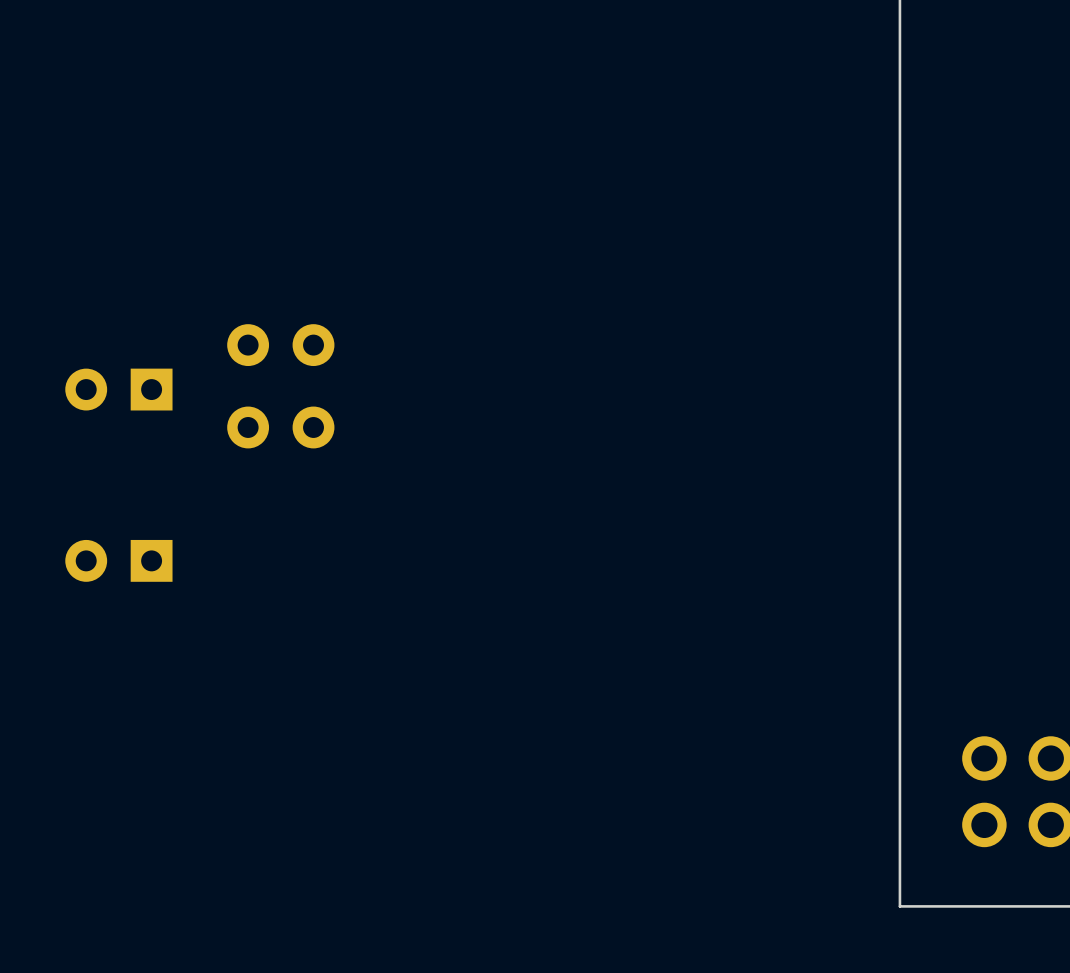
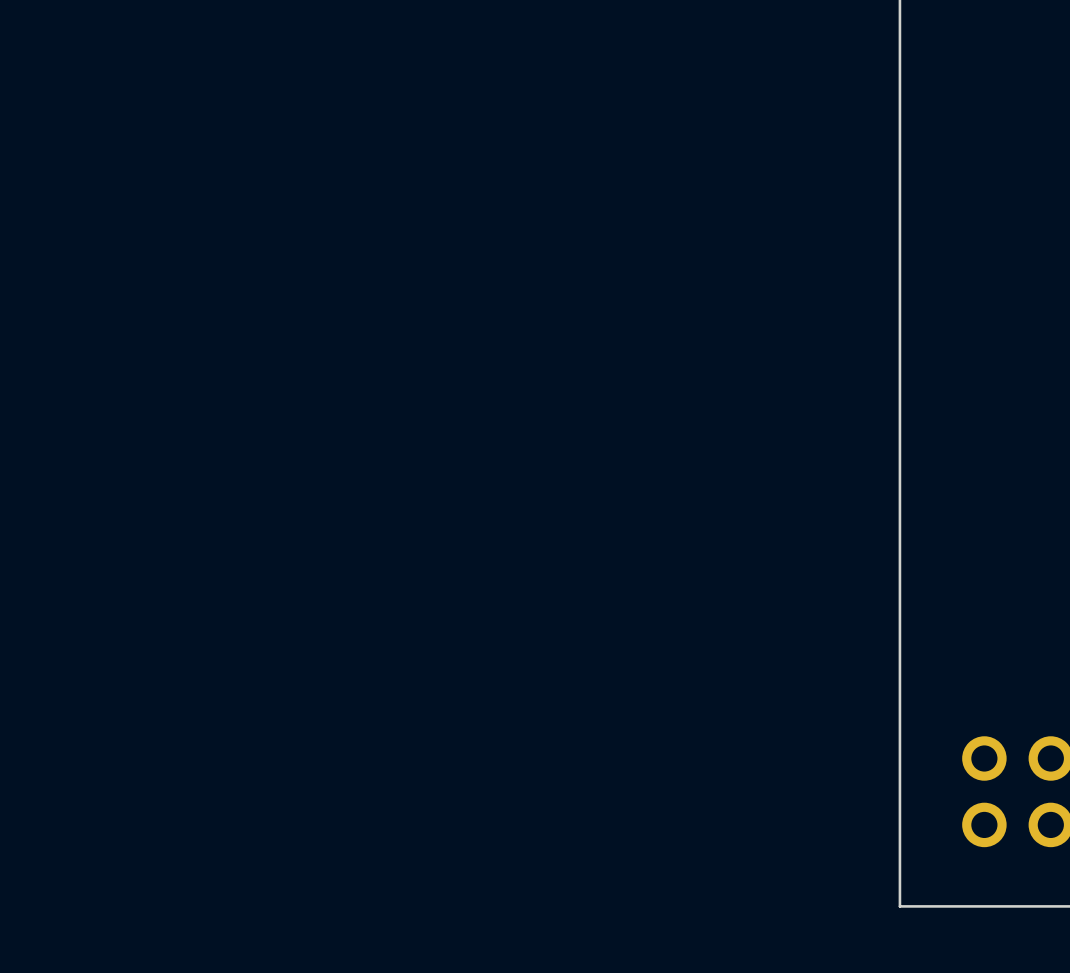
part: (280, 345) -> none
part: (118, 389) -> none
part: (280, 427) -> none
part: (118, 560) -> none

